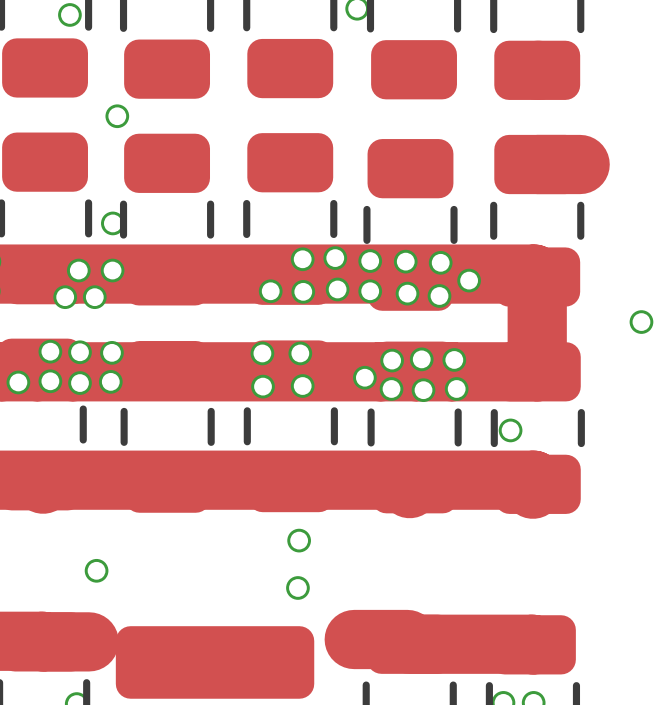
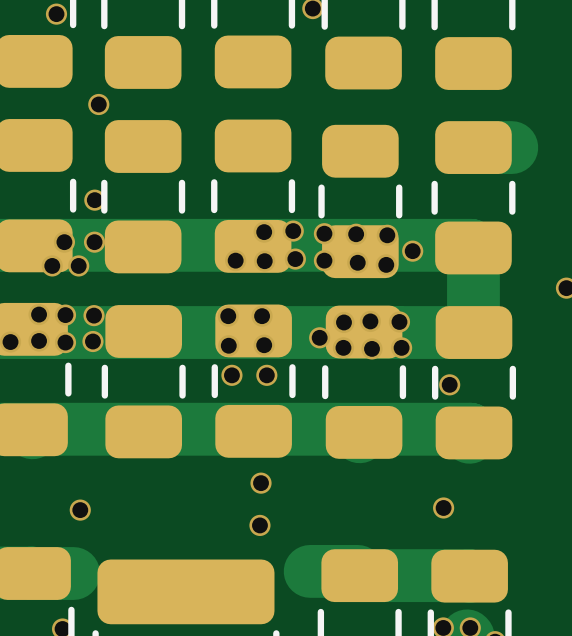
via: none -> (231, 375)
via: none -> (266, 375)
via: none -> (443, 507)

